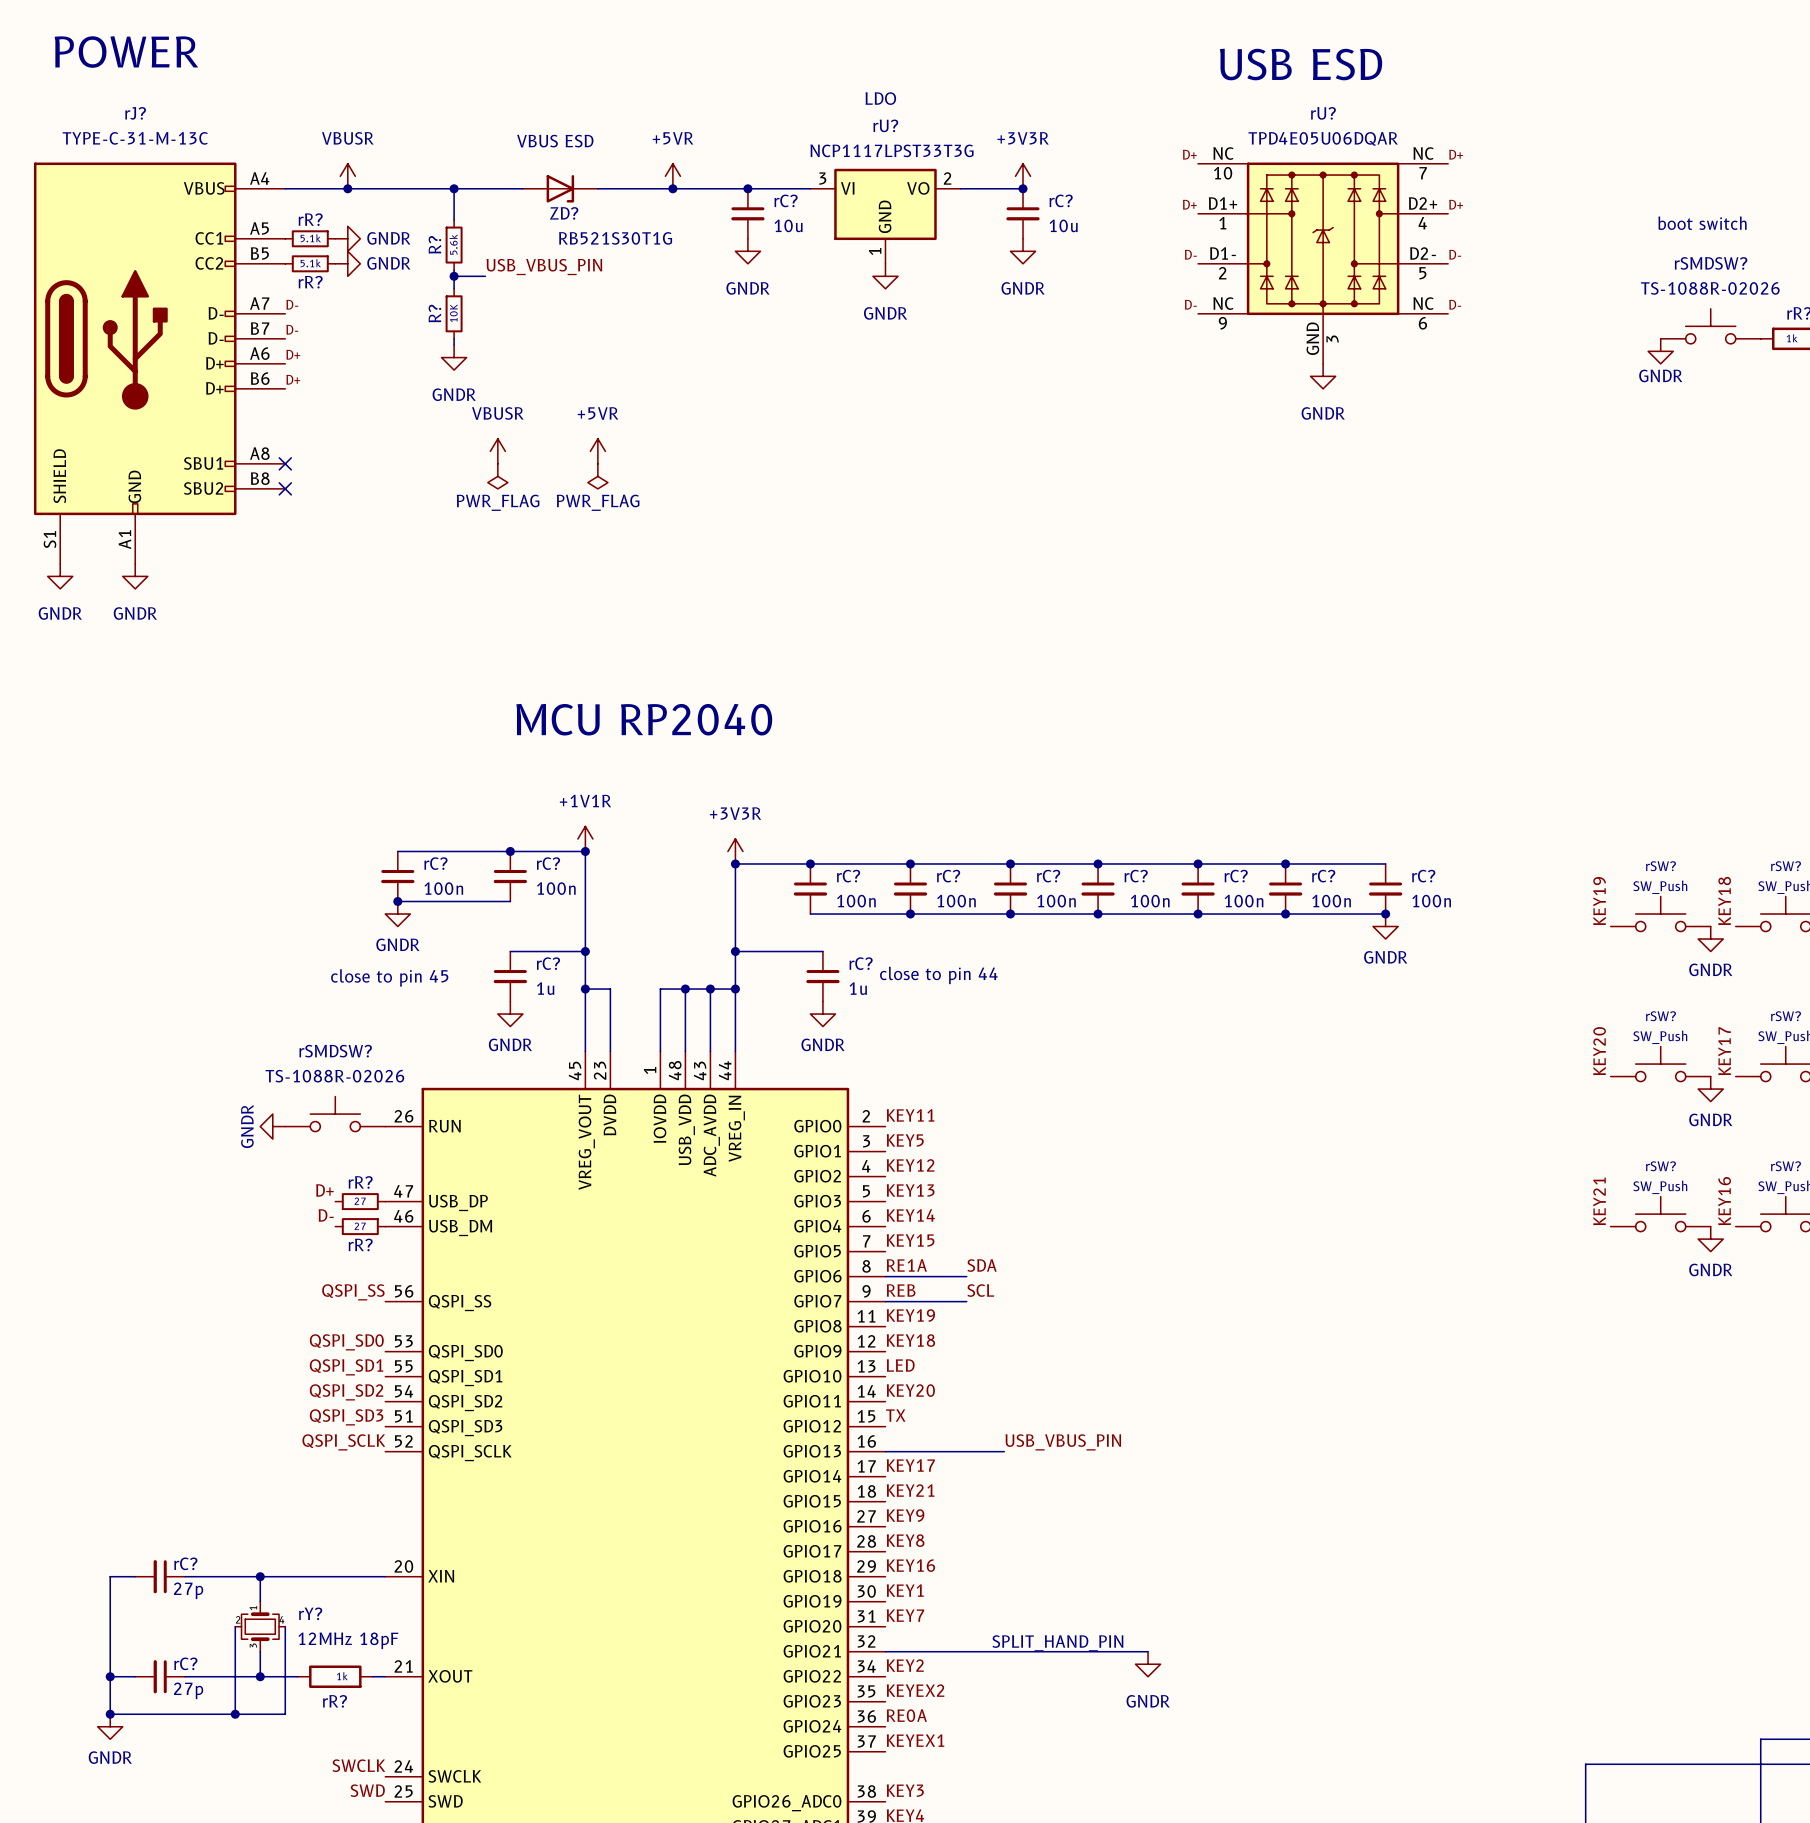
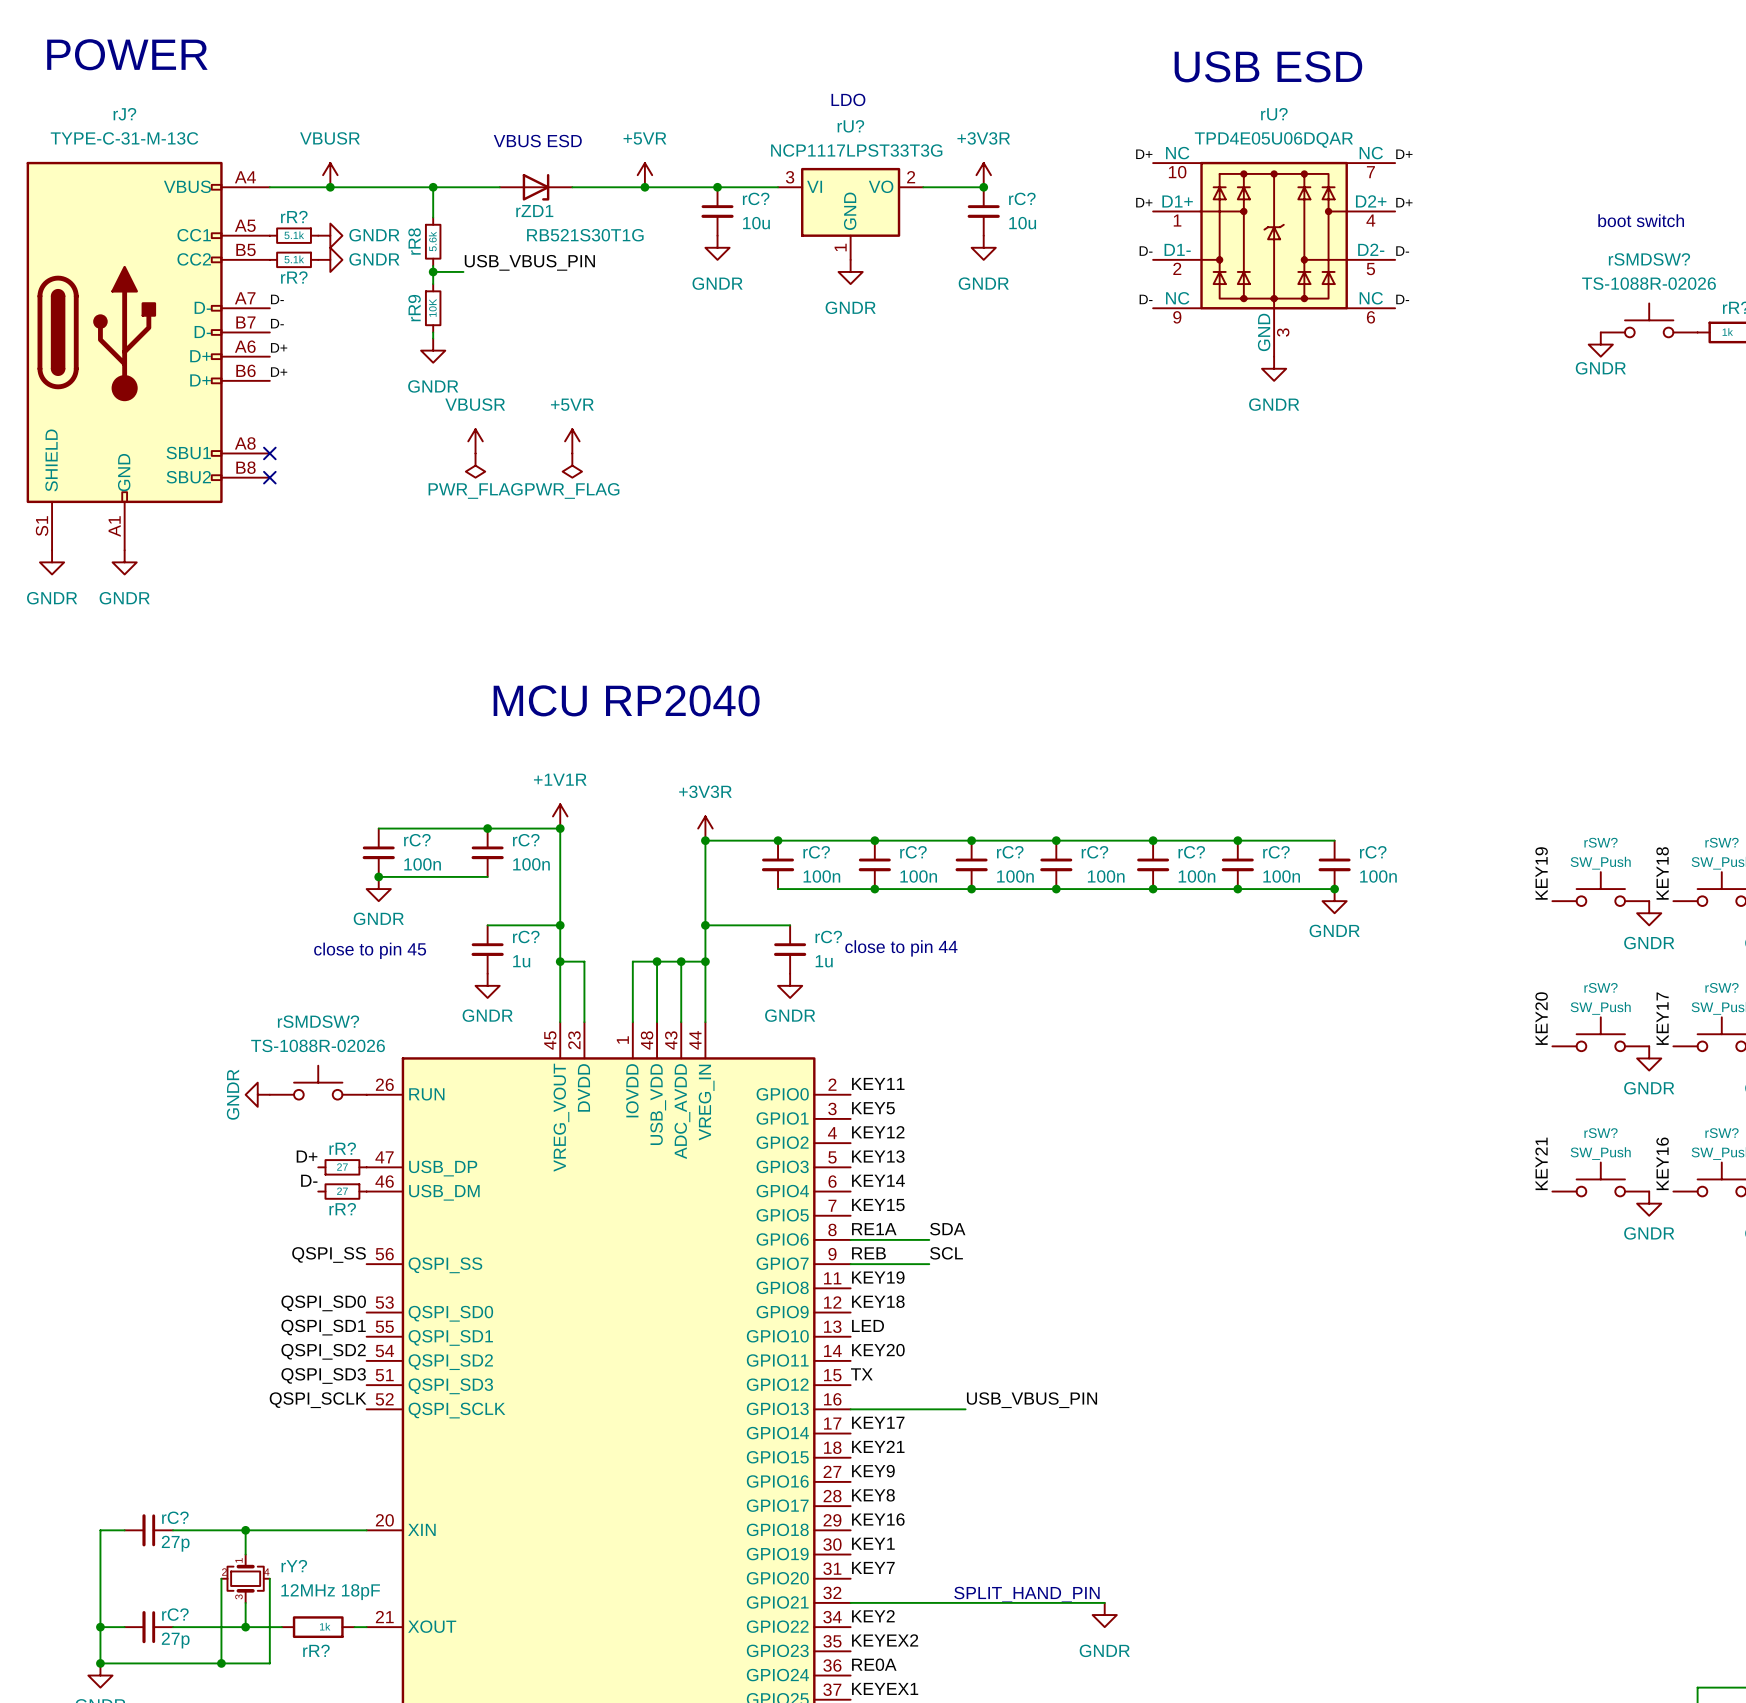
ZD? name: ZD? (564, 213) -> rZD1 (534, 211)
R? name: R? (434, 244) -> rR8 (414, 241)
R? name: R? (434, 313) -> rR9 (414, 308)

